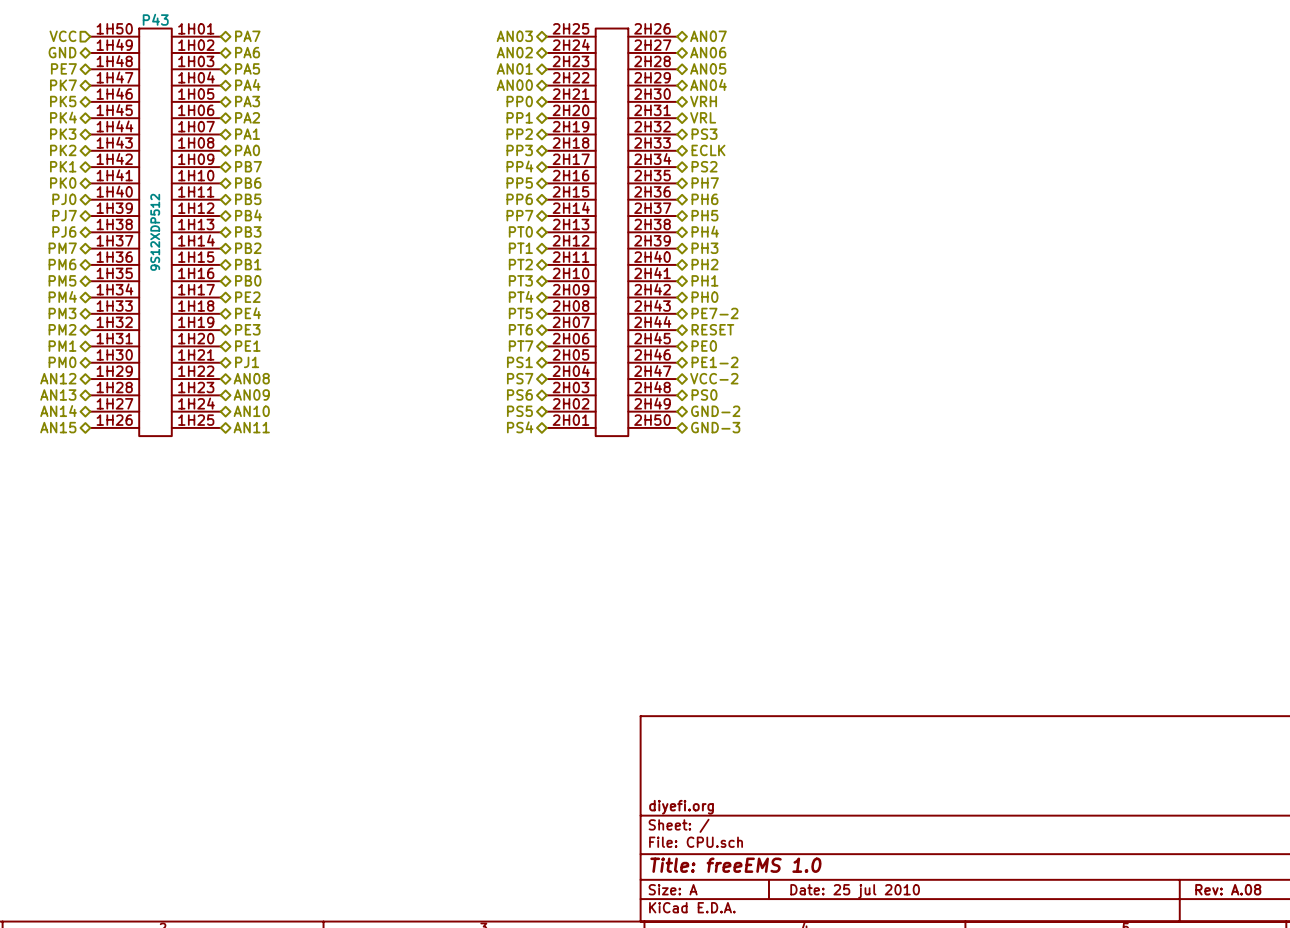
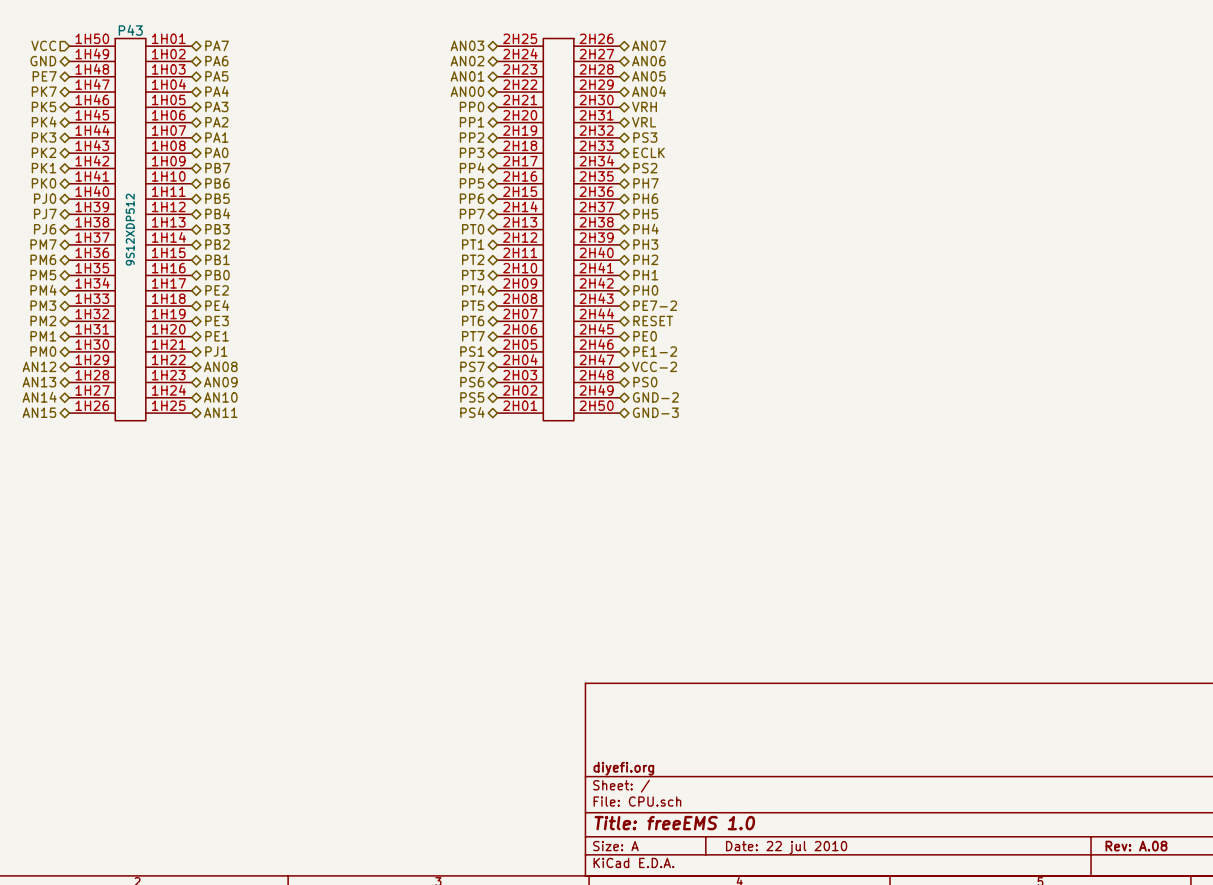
title block: Date: 25 jul 2010 (855, 891) -> Date: 22 jul 2010 (786, 847)

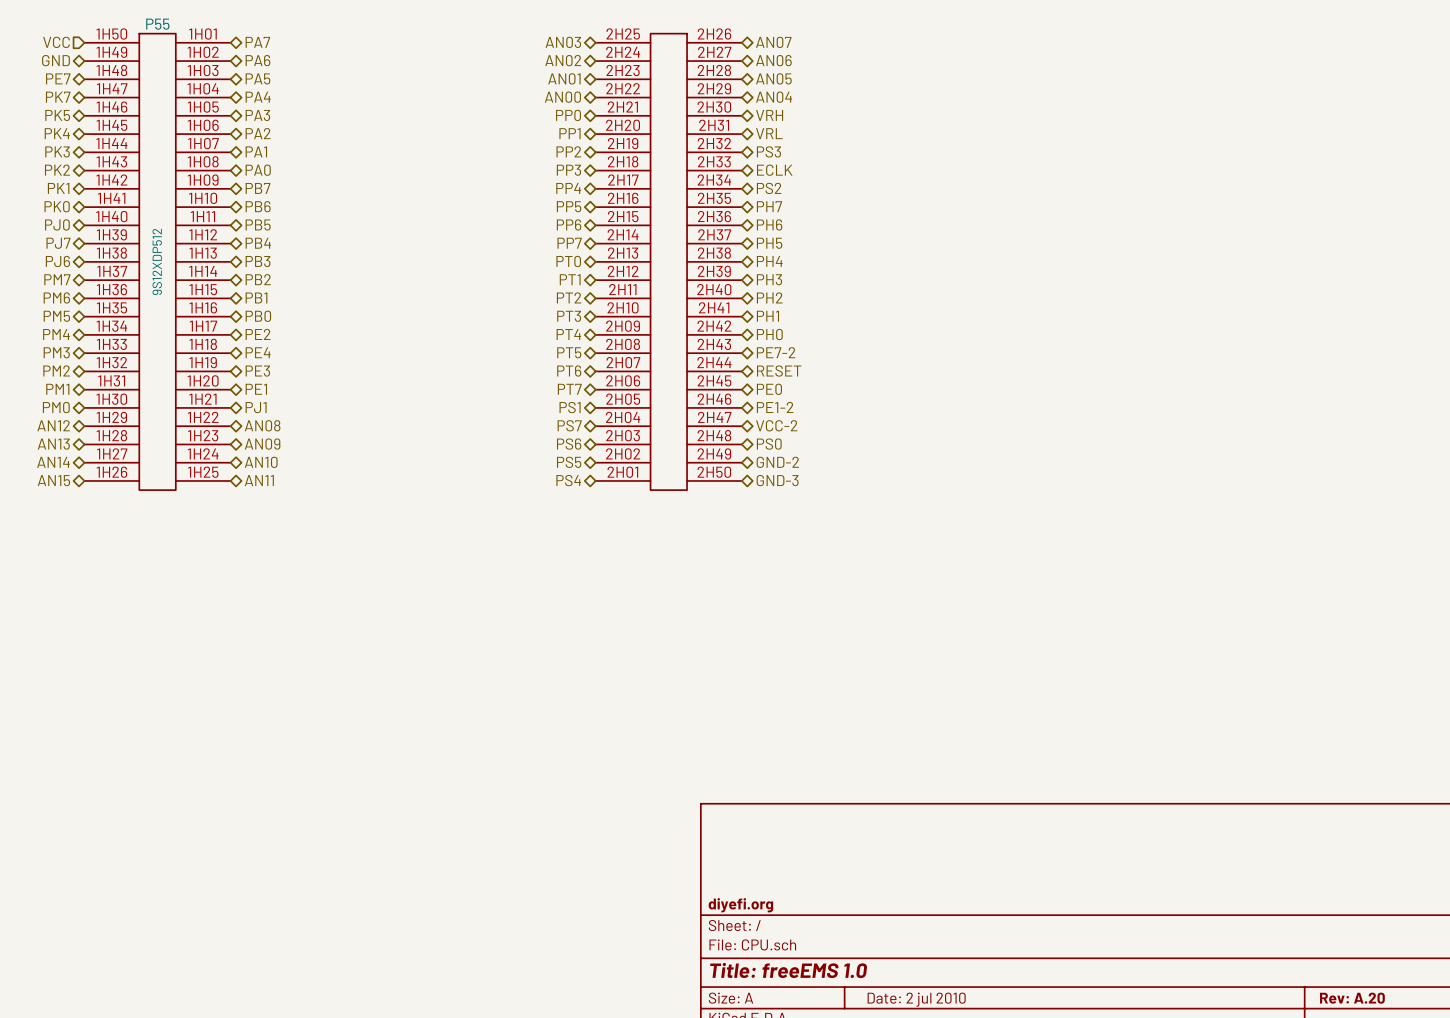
P43 name: P43 (130, 30) -> P55 (157, 24)
title block: Rev: A.08 (1136, 846) -> Rev: A.20 (1352, 998)
title block: Date: 22 jul 2010 (786, 847) -> Date: 2 jul 2010 (916, 999)

